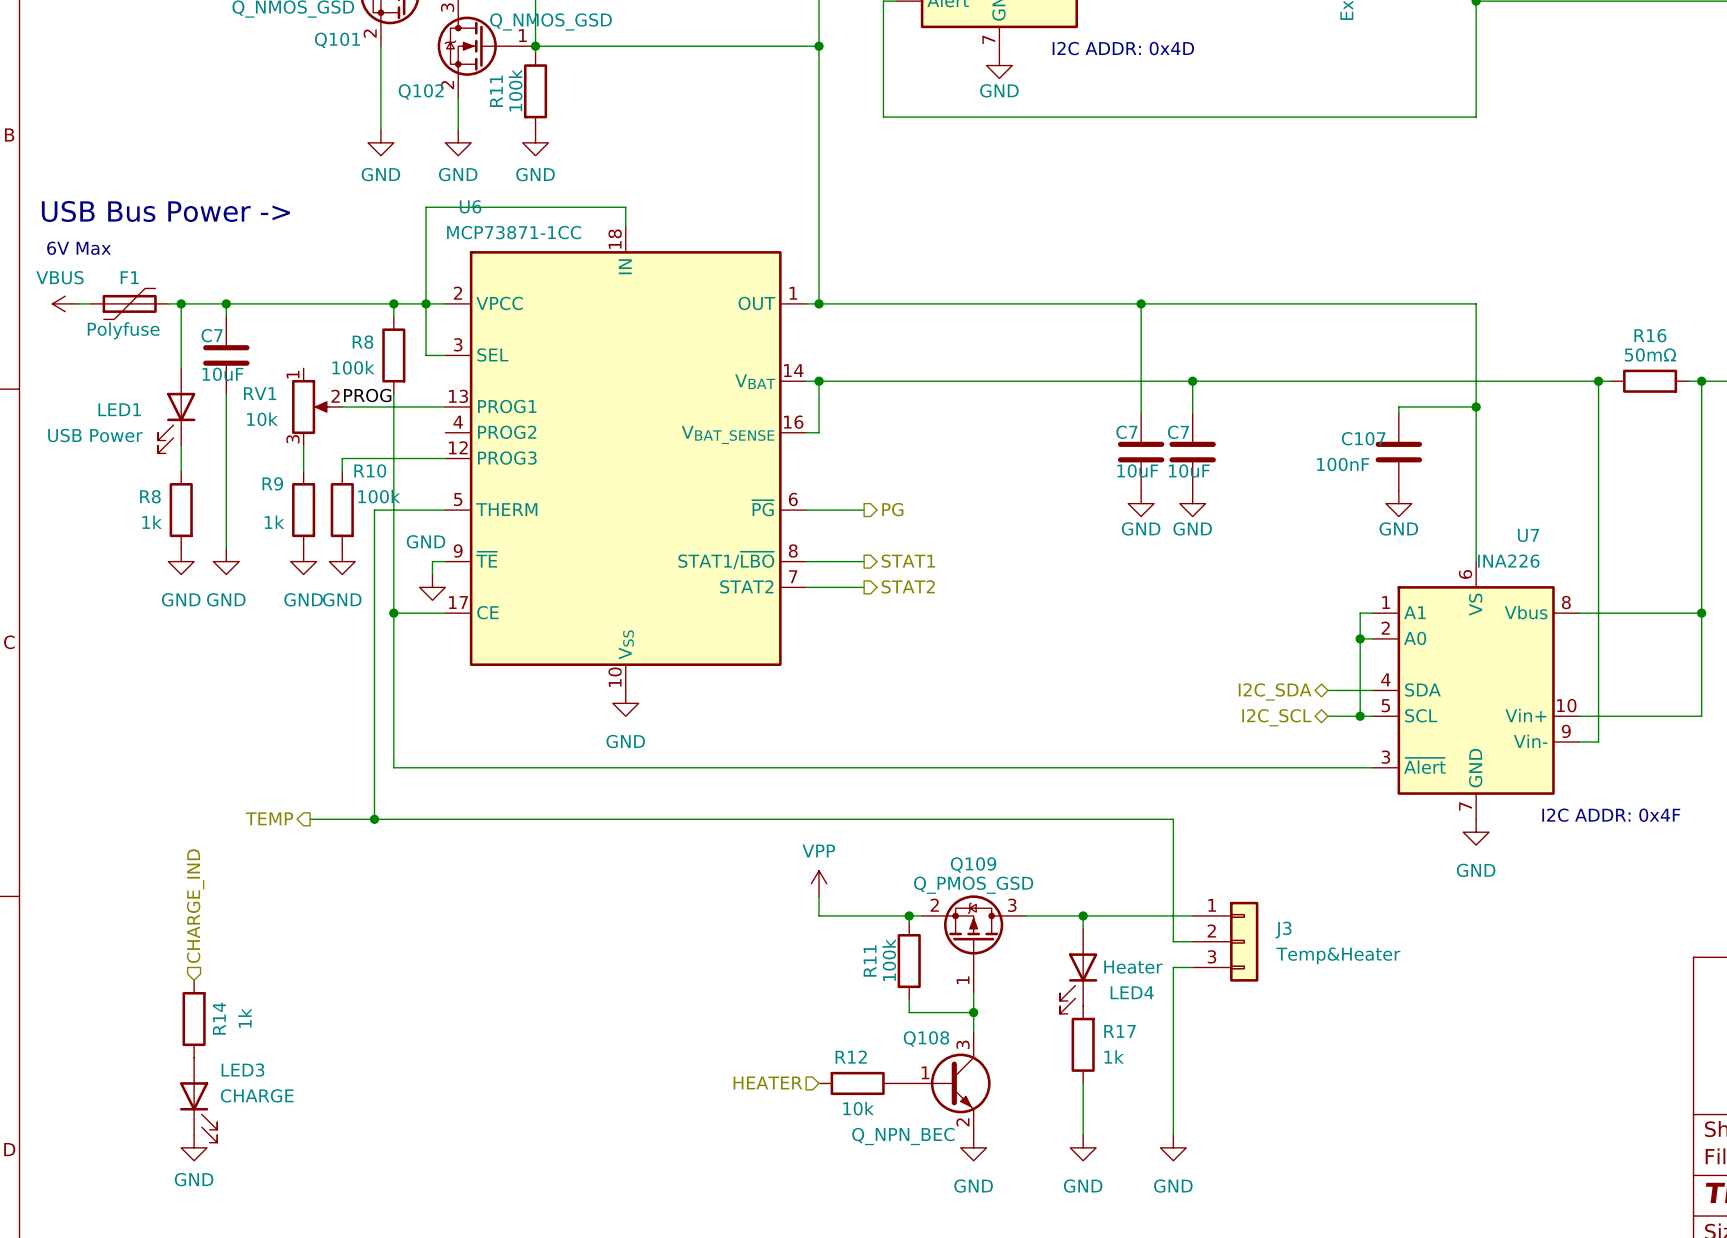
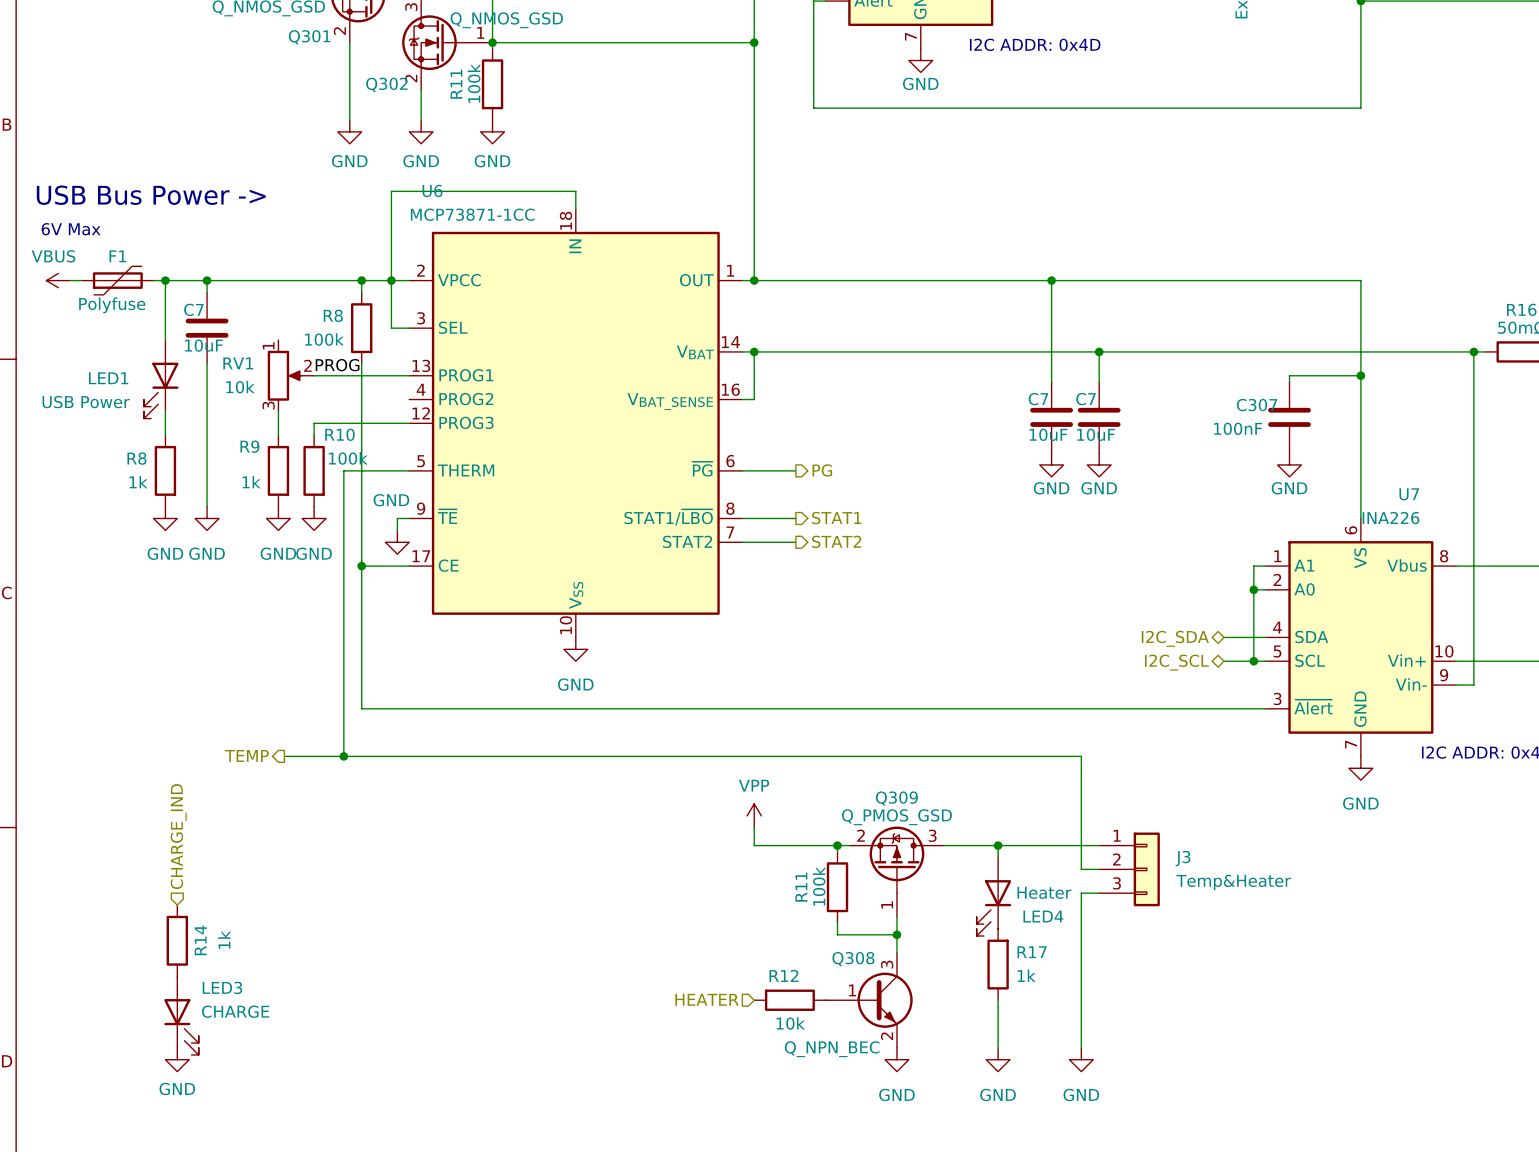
Q101 name: Q101 (337, 40) -> Q301 (309, 37)
Q102 name: Q102 (421, 91) -> Q302 (386, 84)
C107 name: C107 (1363, 438) -> C307 (1257, 405)
Q109 name: Q109 (973, 864) -> Q309 (896, 798)
Q108 name: Q108 (926, 1038) -> Q308 (853, 959)

